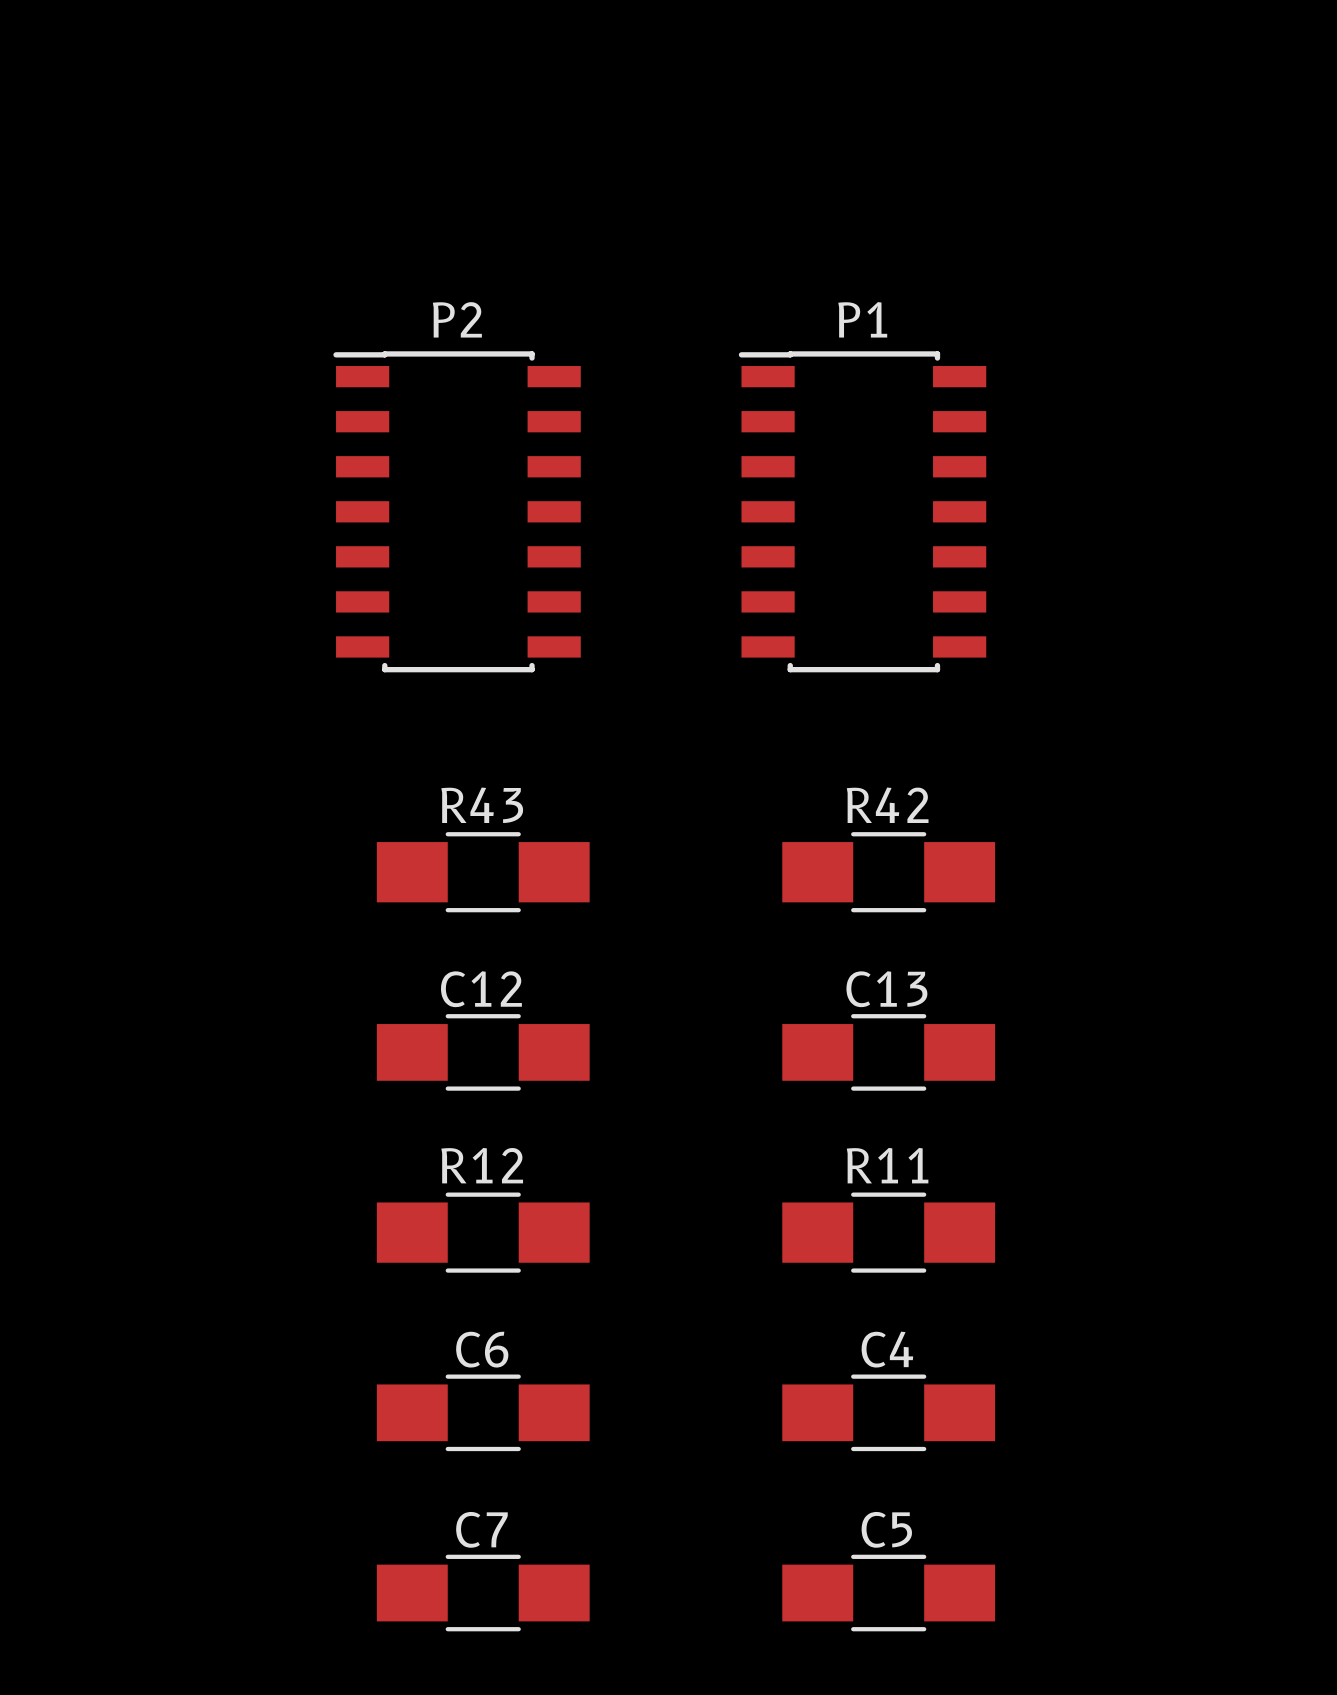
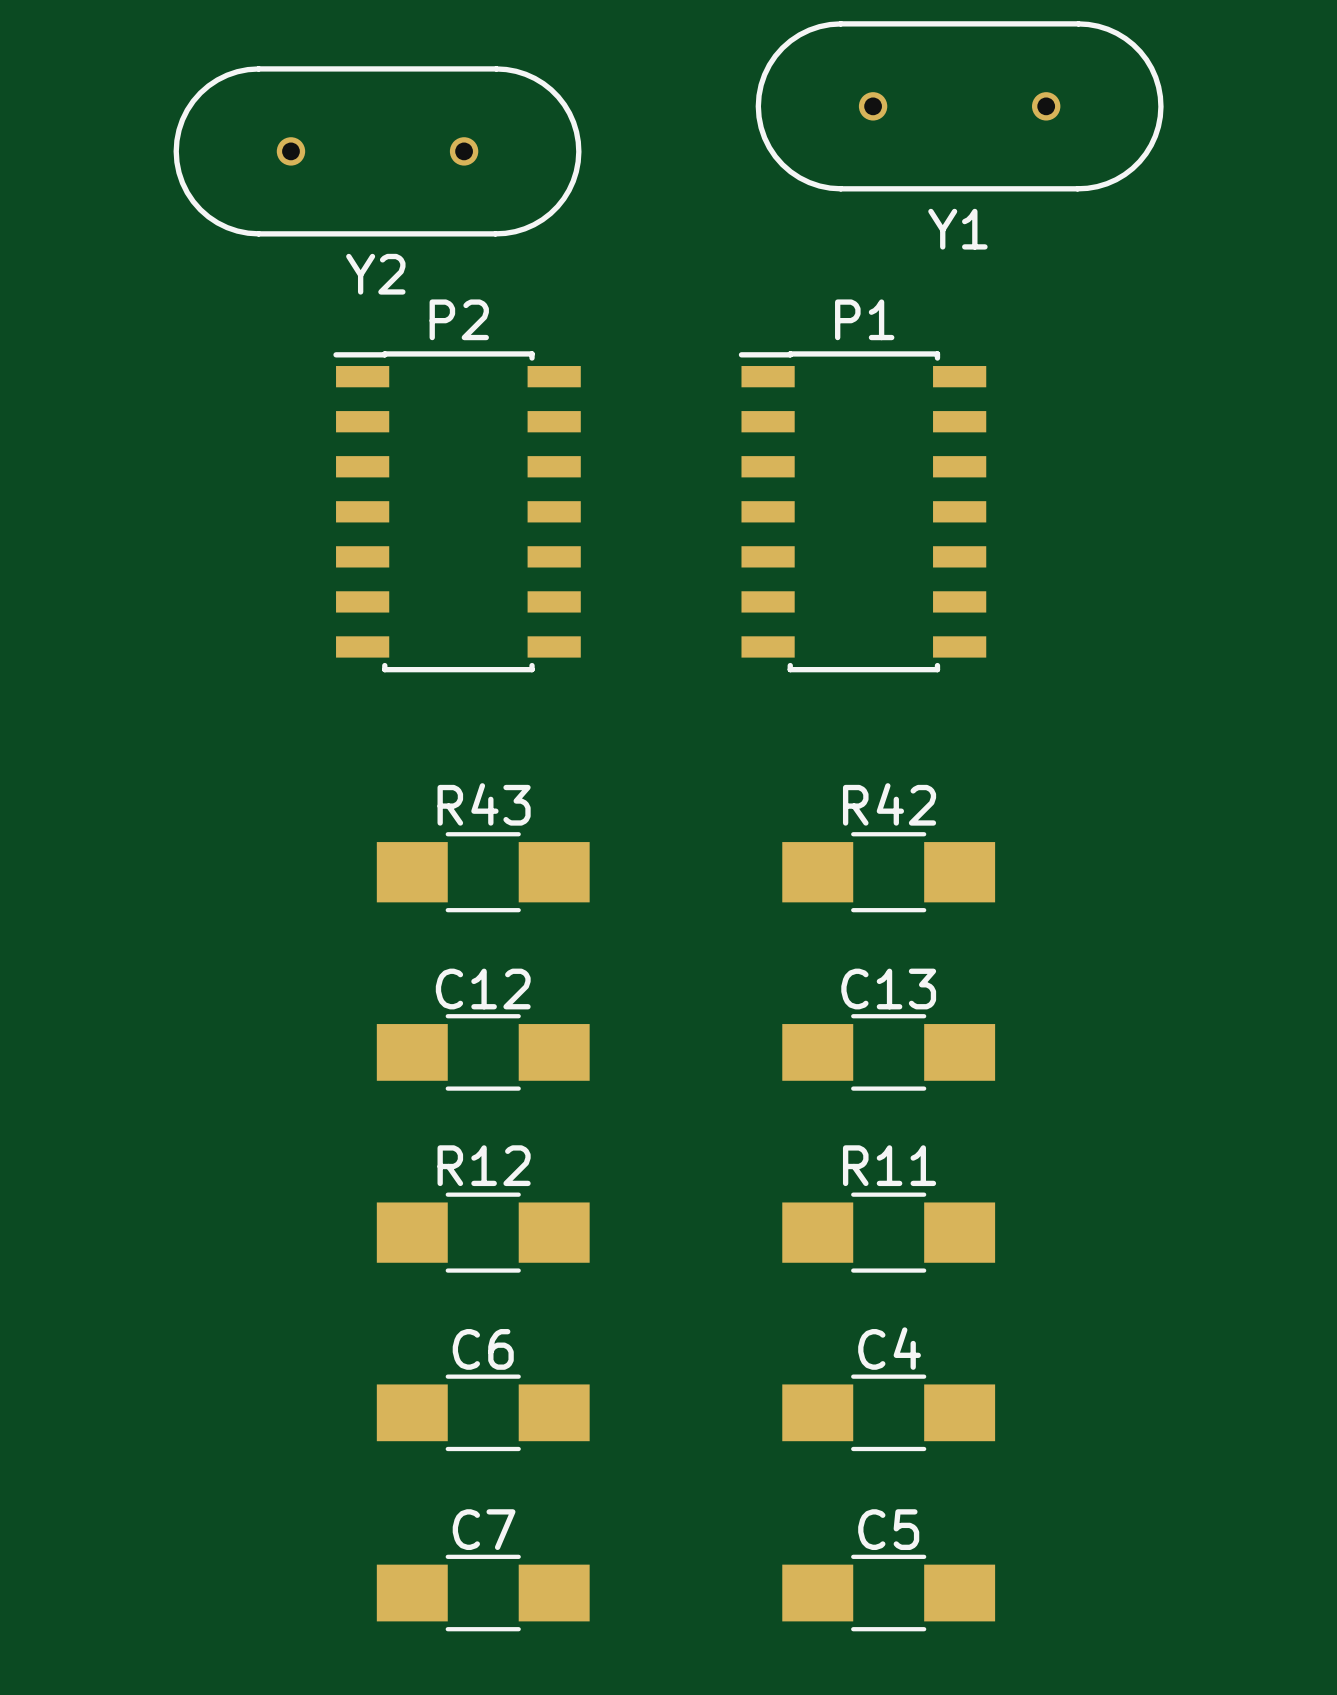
Y1: none -> (959, 106)
Y2: none -> (377, 151)

